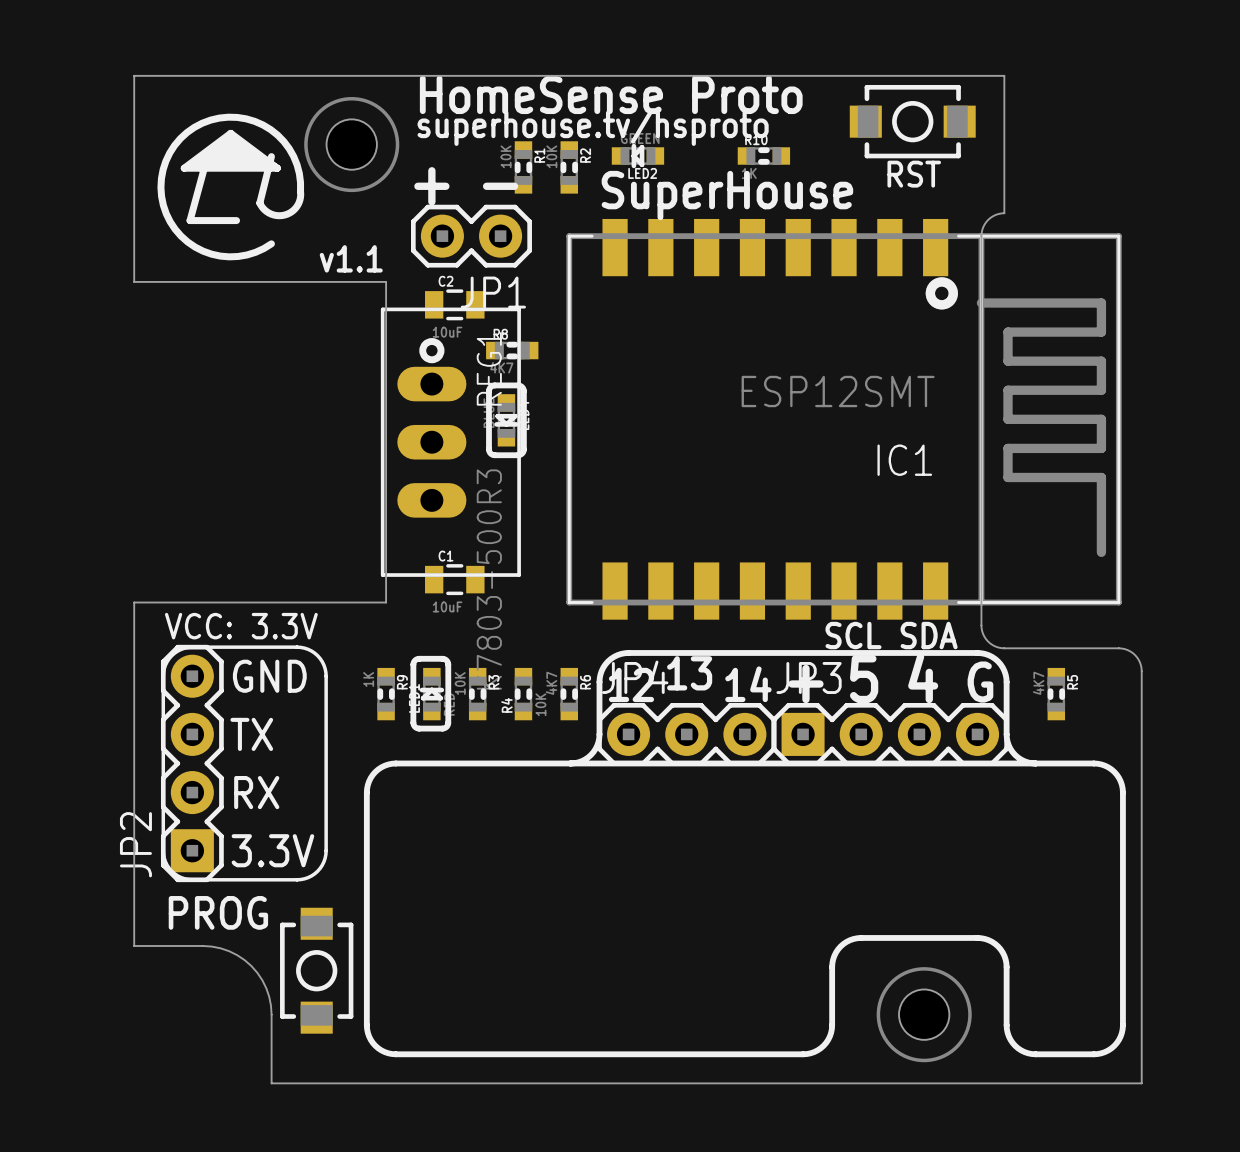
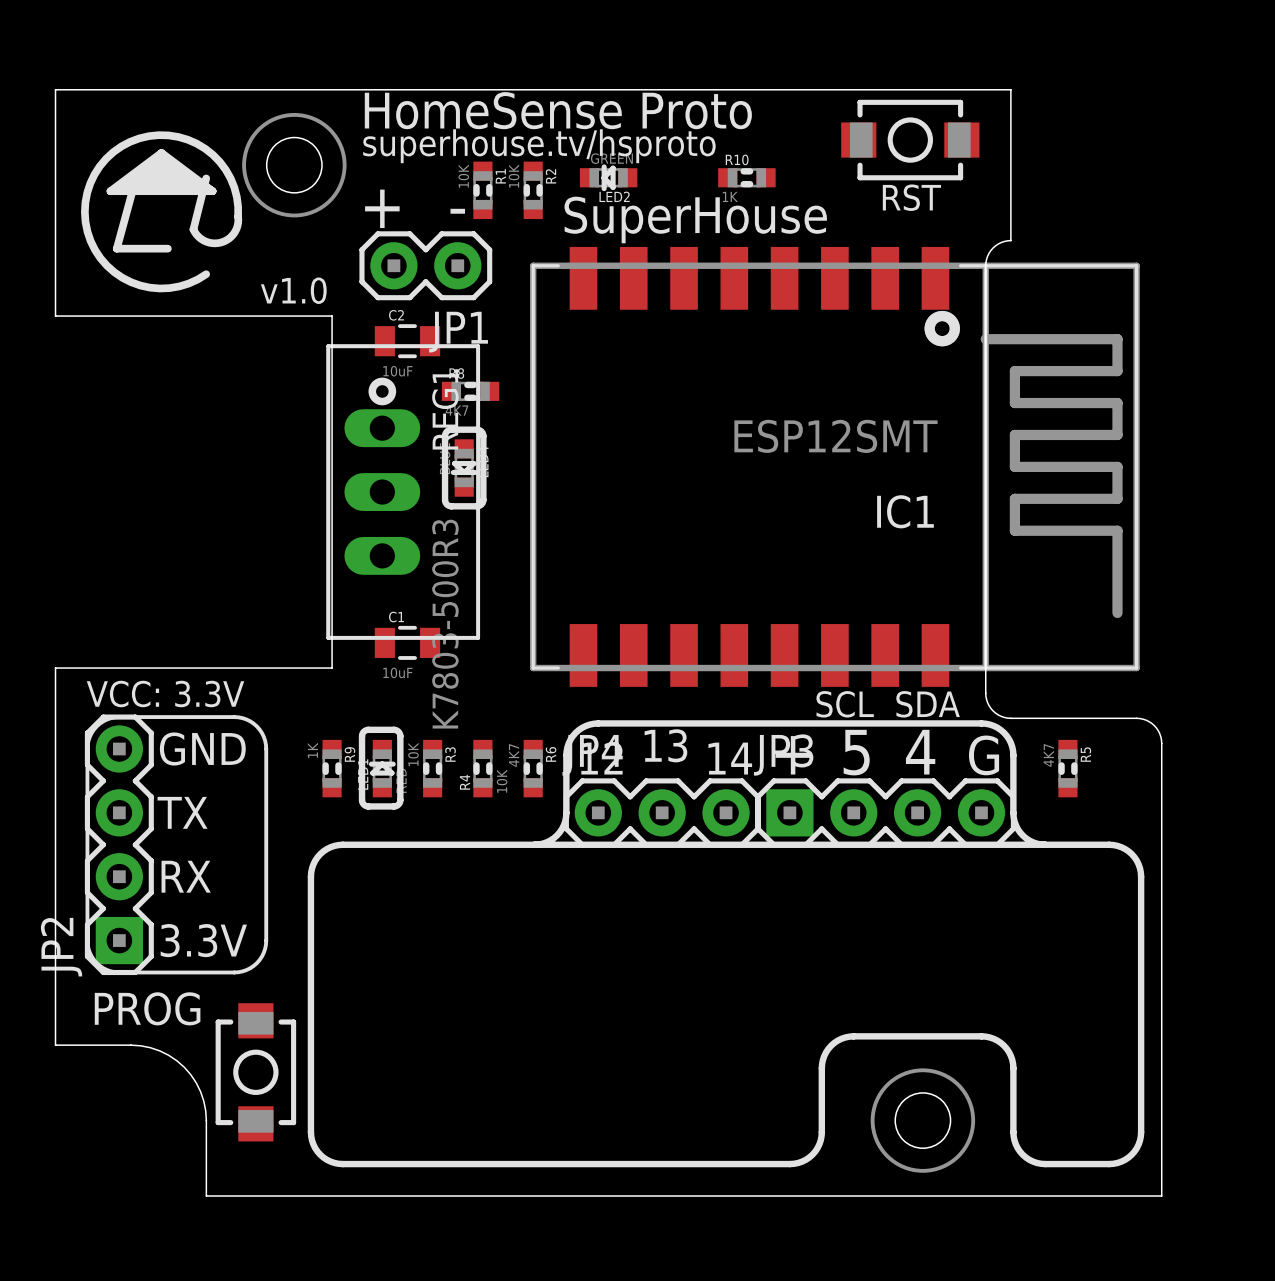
text: v1.1 (351, 258) -> v1.0 (293, 290)

